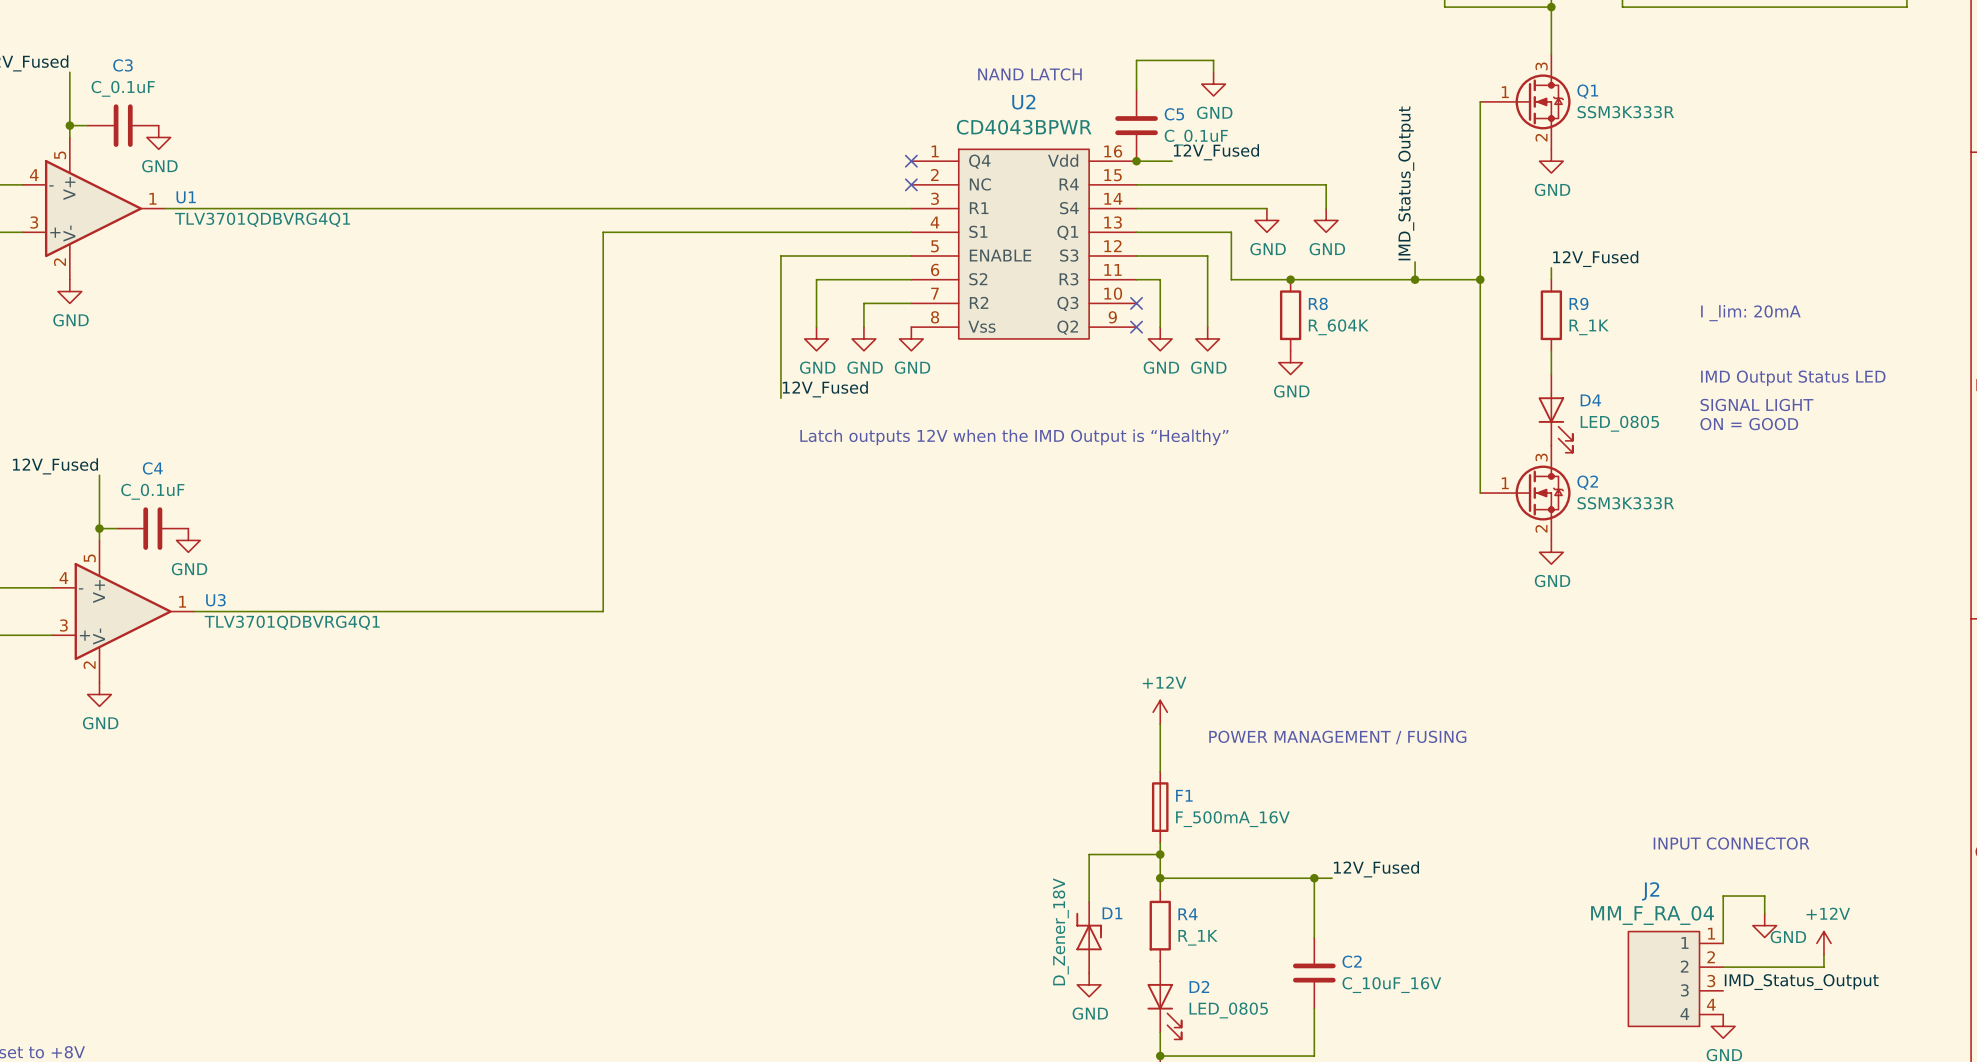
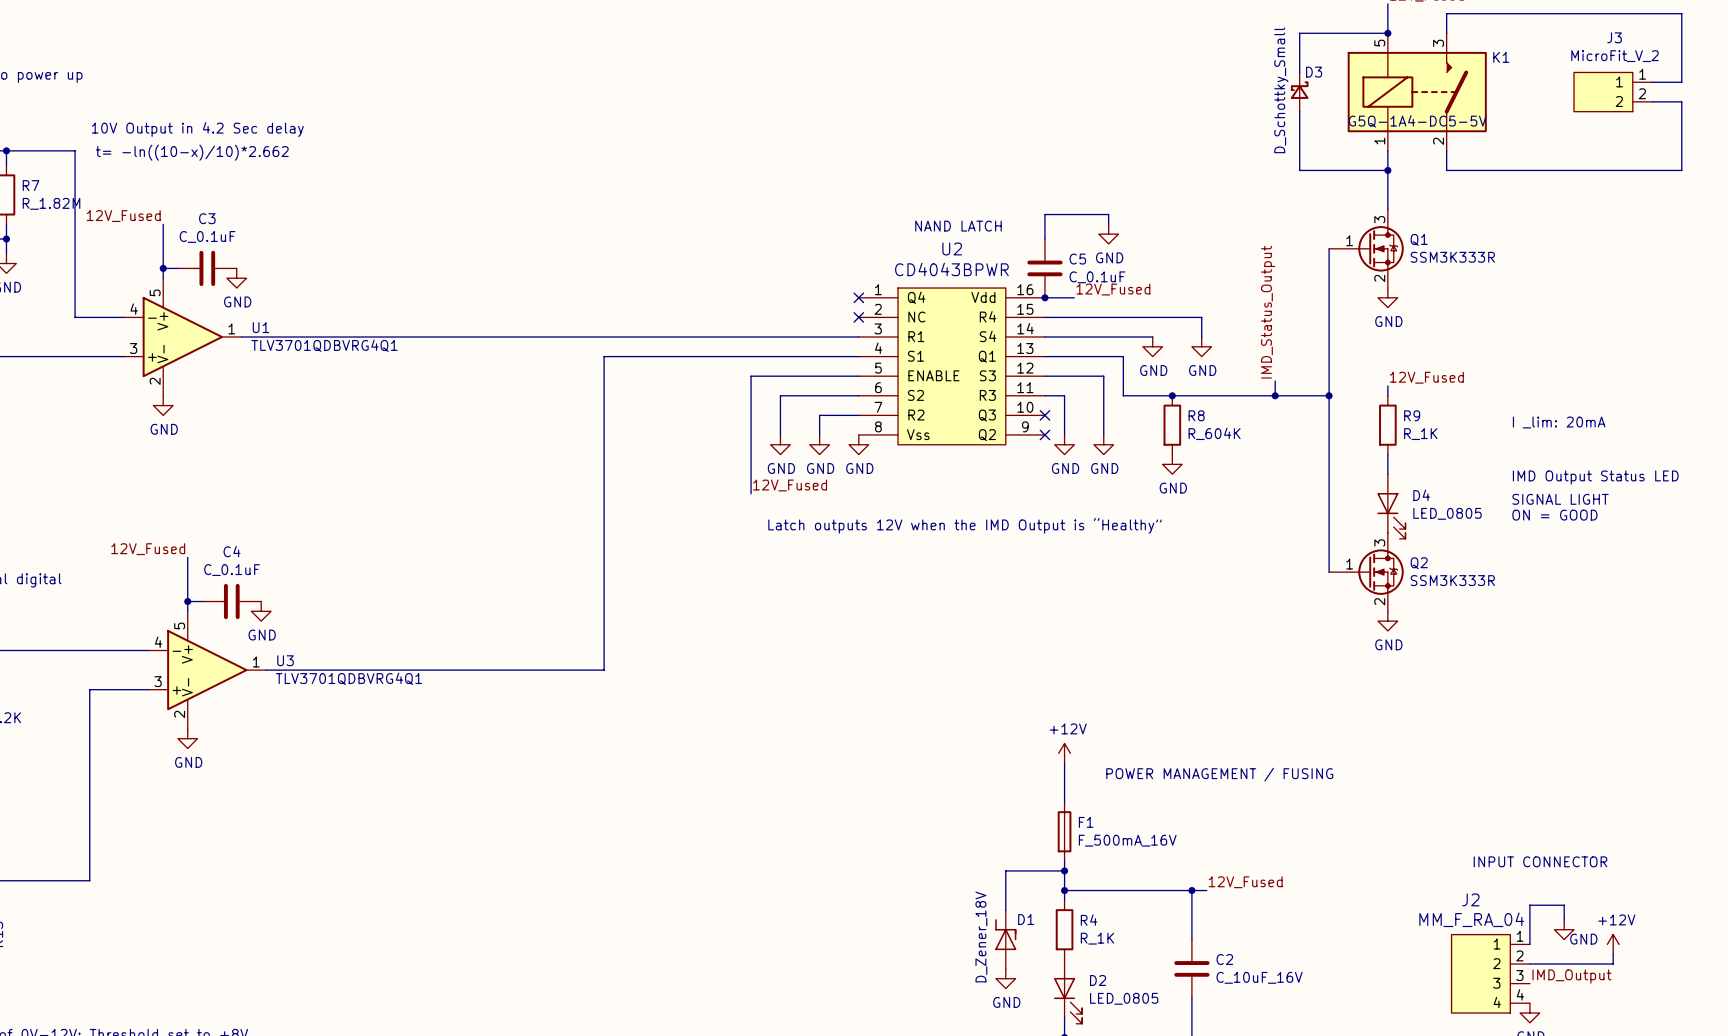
label: IMD_Status_Output (1801, 982) -> IMD_Output (1571, 976)

